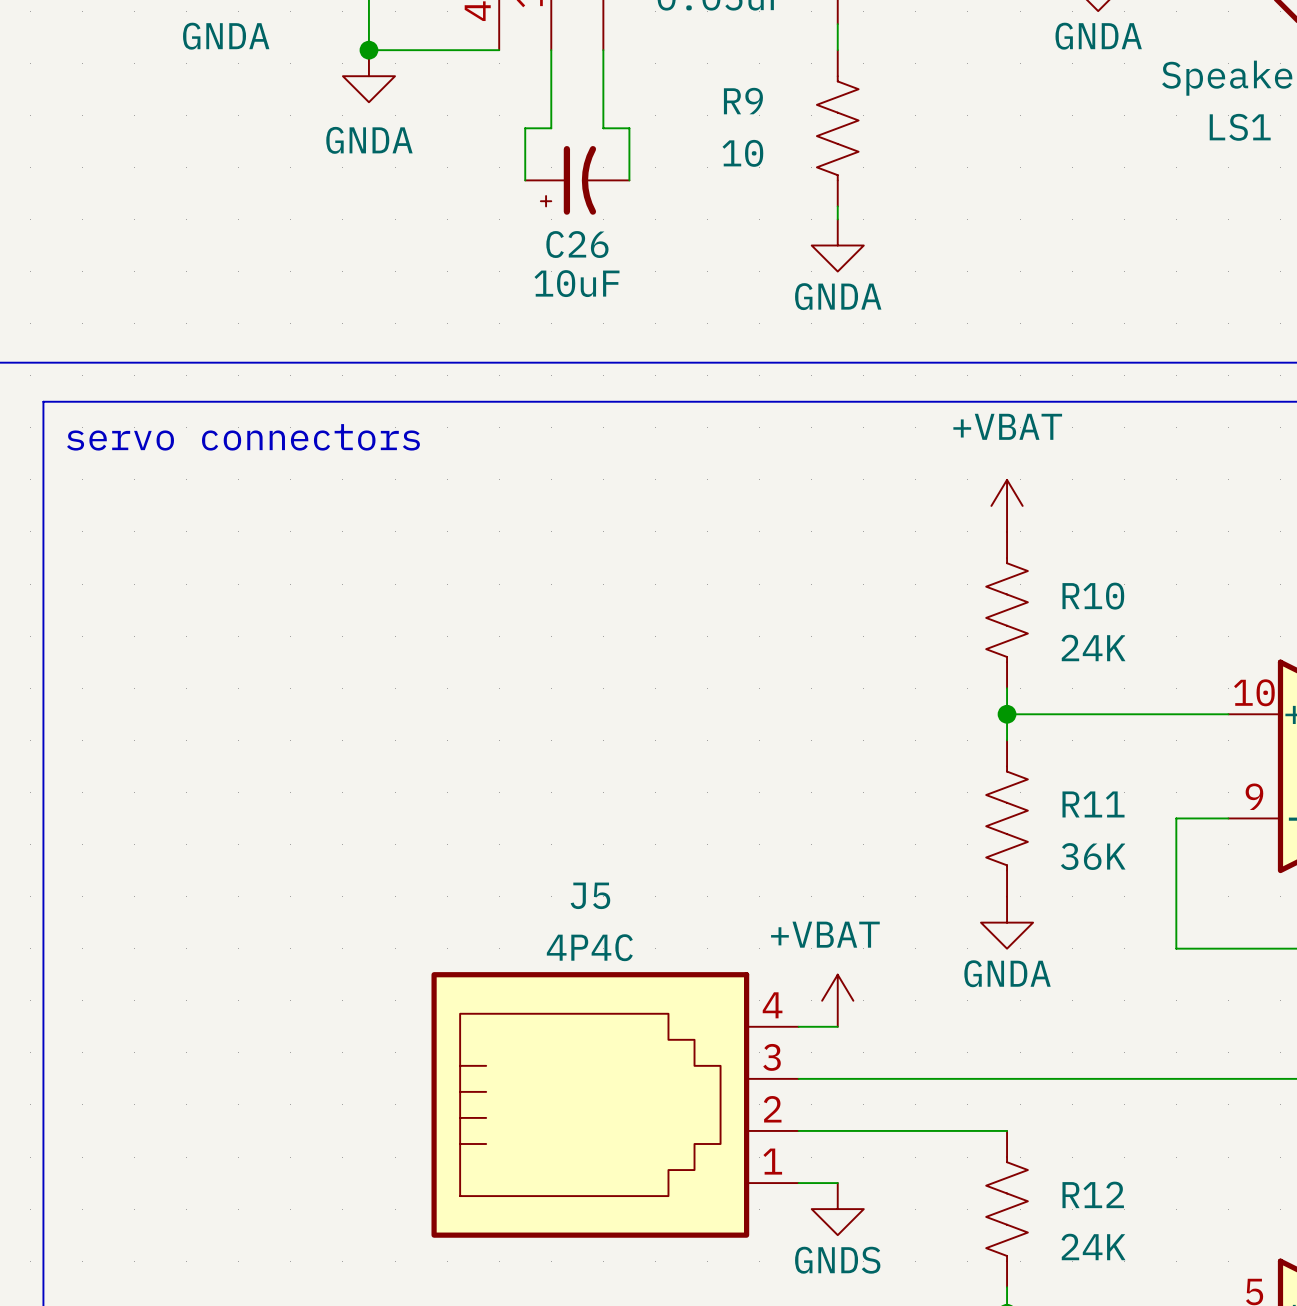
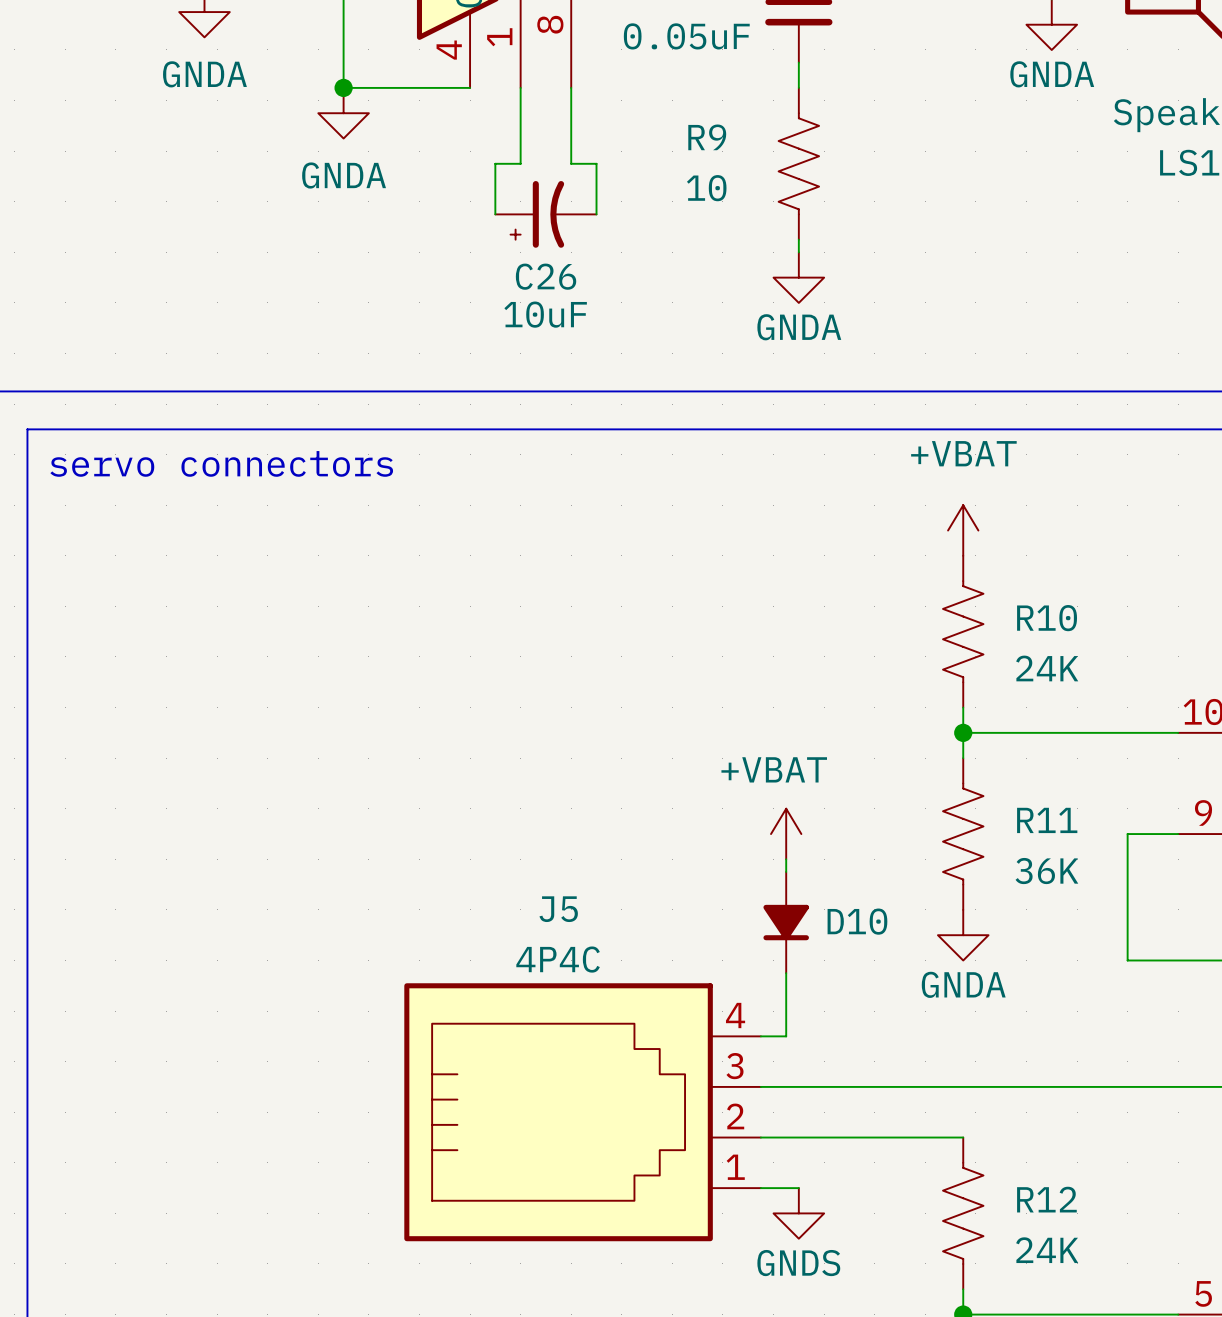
wire: none -> (786, 859) (786, 871)
D10: none -> (786, 922)
power symbol position: +VBAT (837, 1000) -> +VBAT (786, 834)
wire: (824, 1026) (837, 1026) -> (786, 1036) (786, 973)

